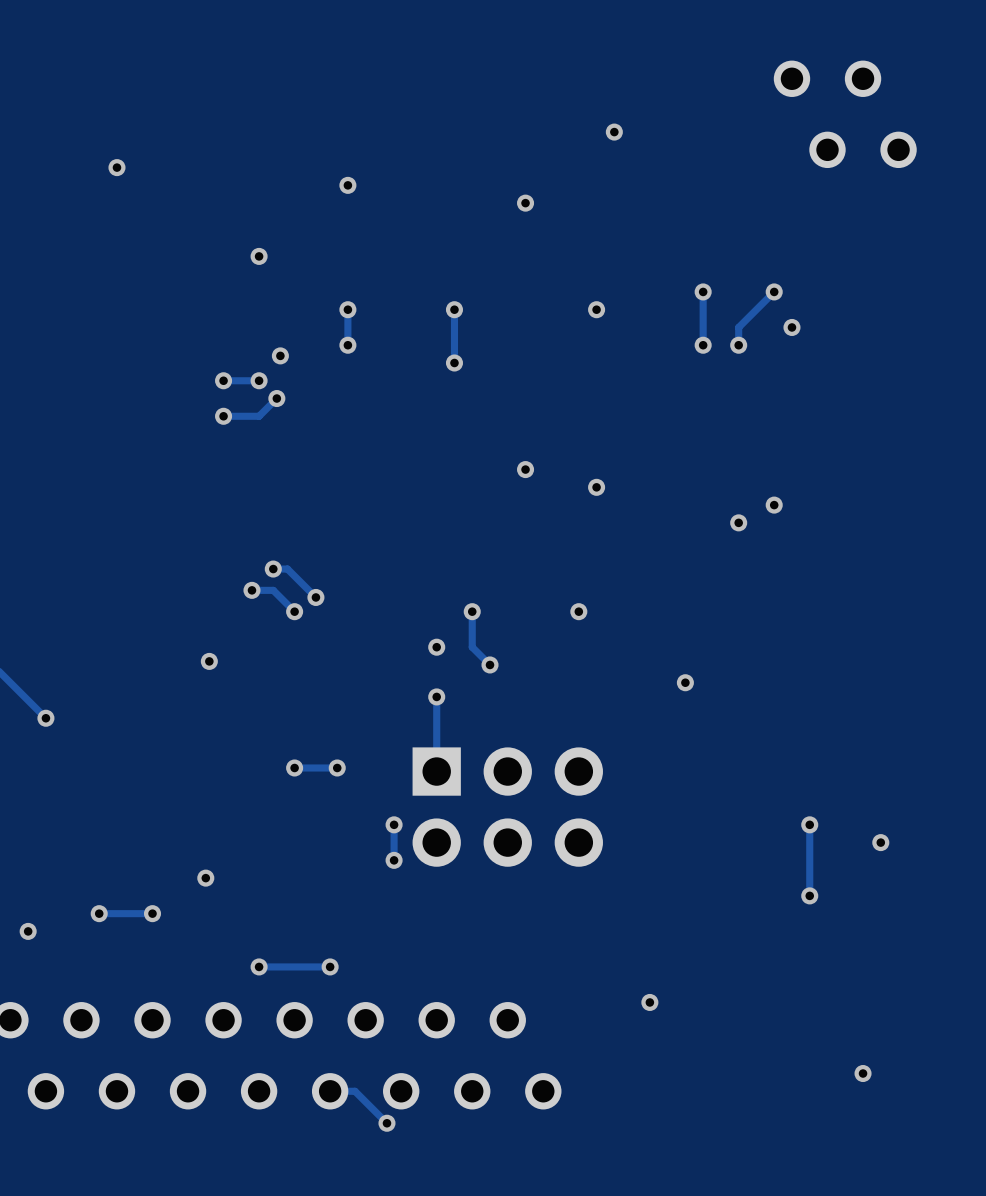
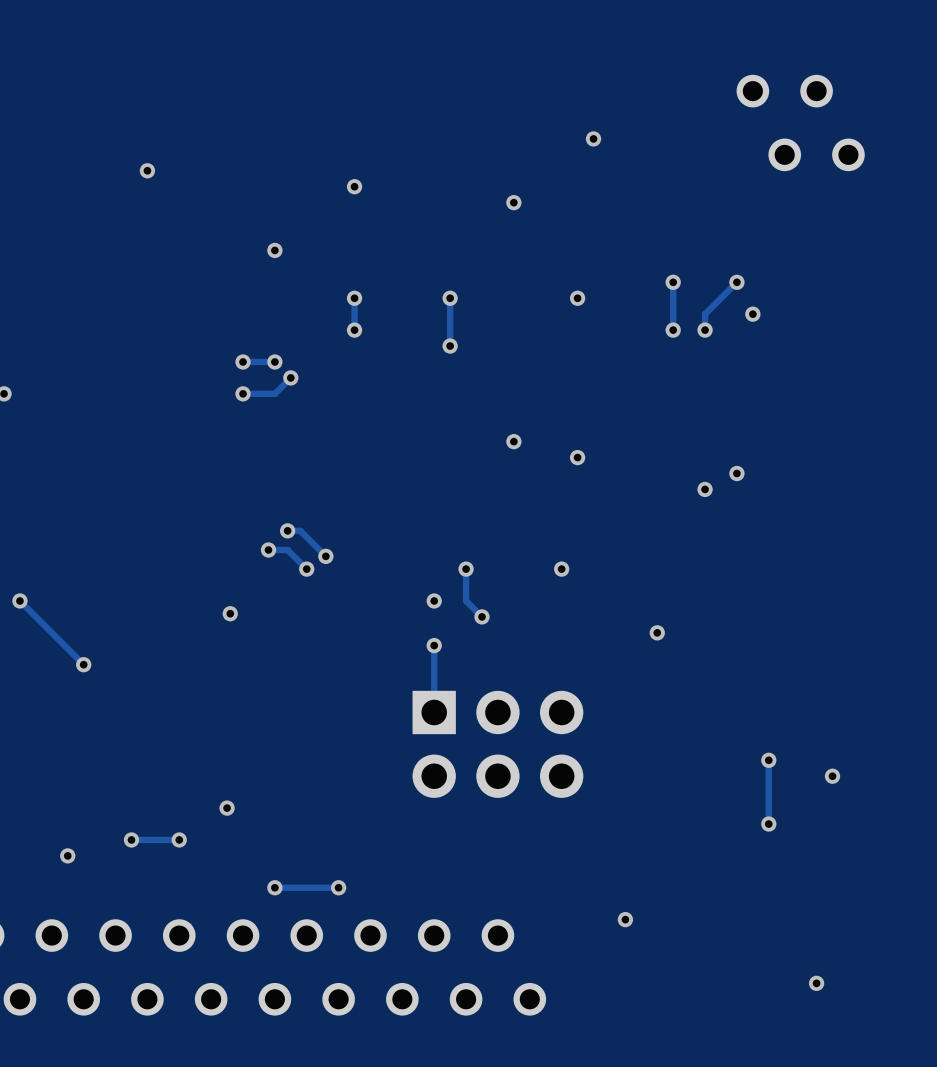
via: (280, 355) -> none
via: (294, 767) -> none
track: (337, 767) (294, 767) -> none
via: (337, 767) -> none
track: (394, 824) (394, 860) -> none
via: (394, 824) -> none
via: (394, 860) -> none
track: (330, 1091) (355, 1091) (386, 1123) -> none
via: (386, 1123) -> none

